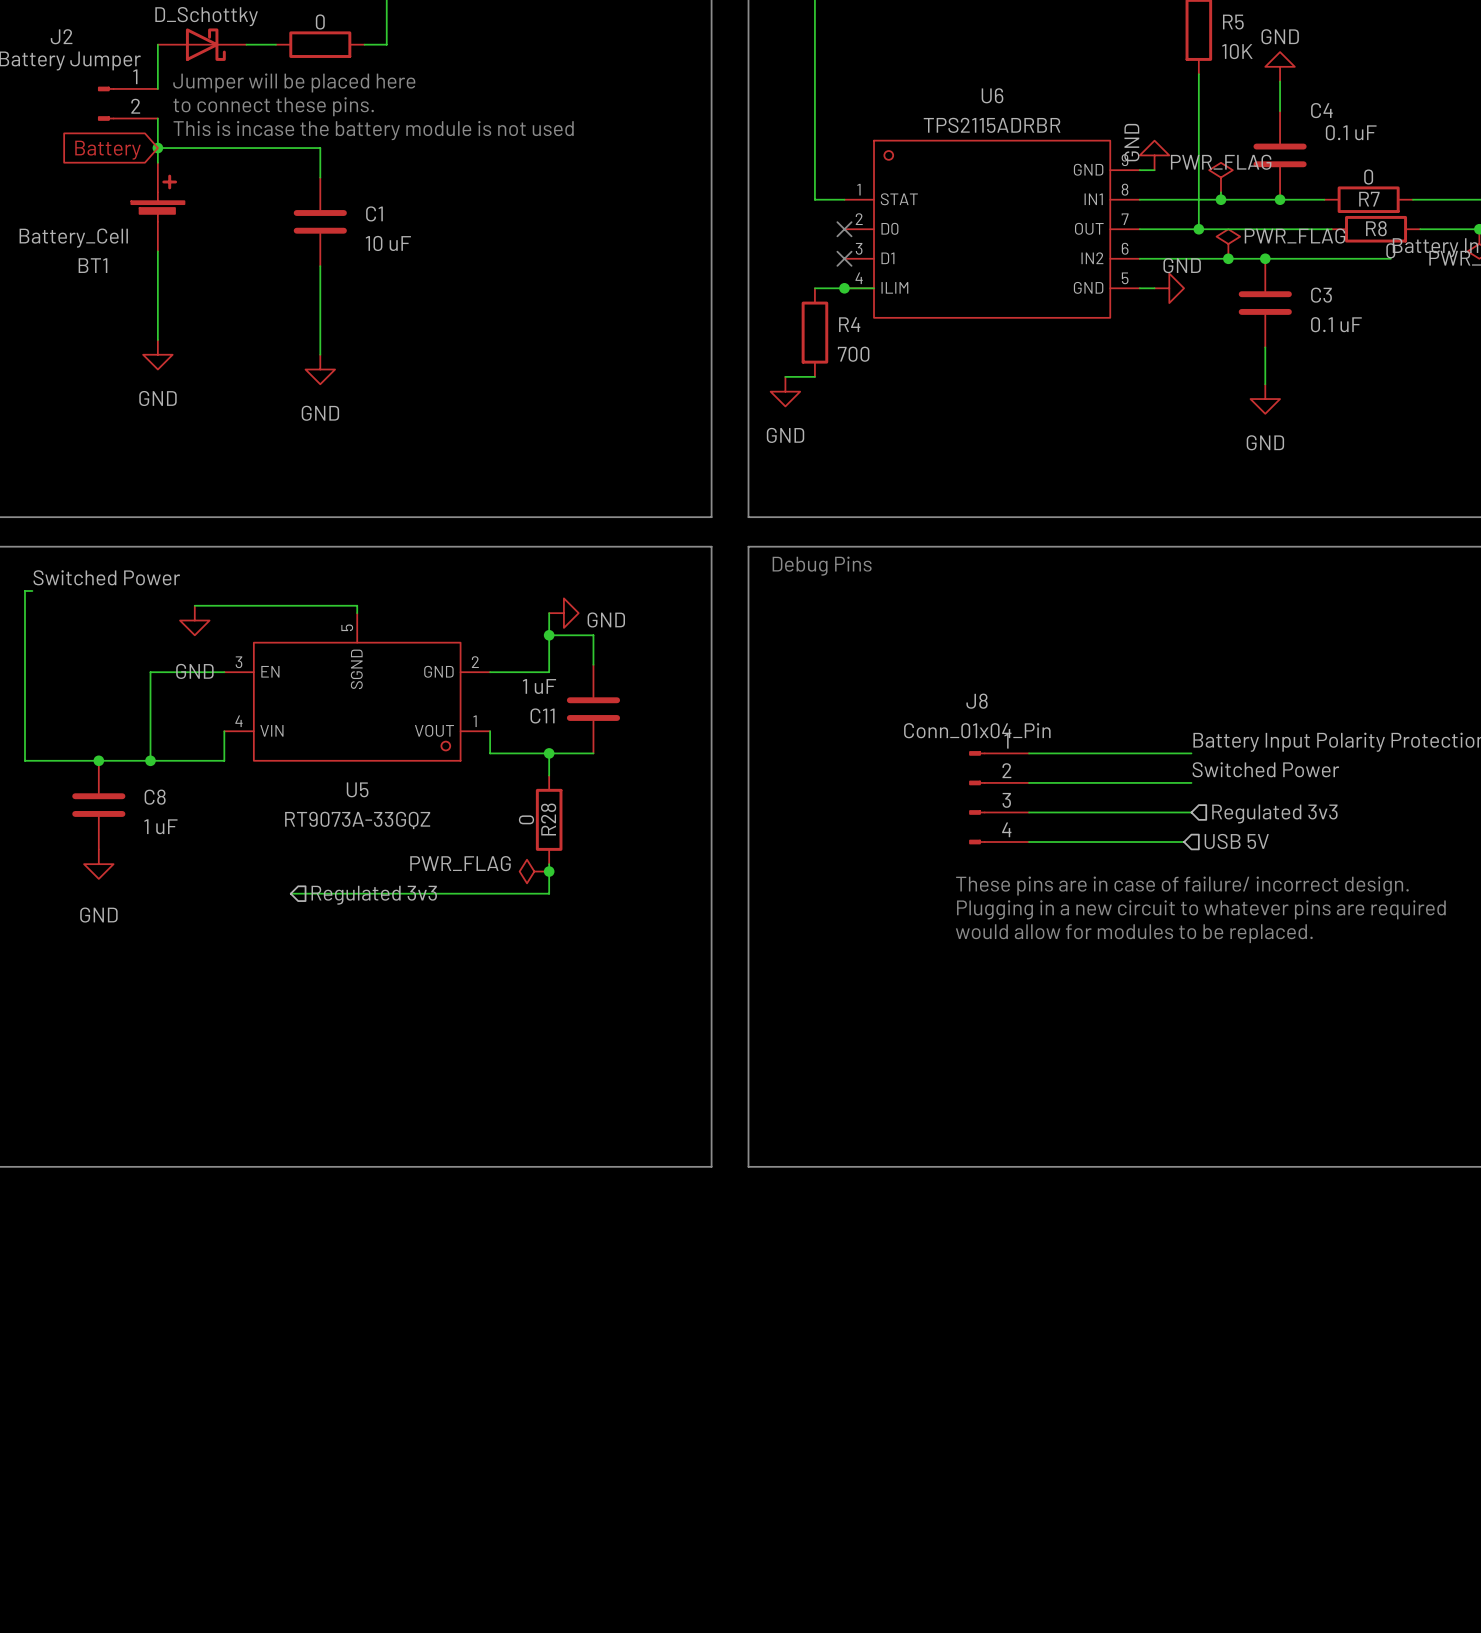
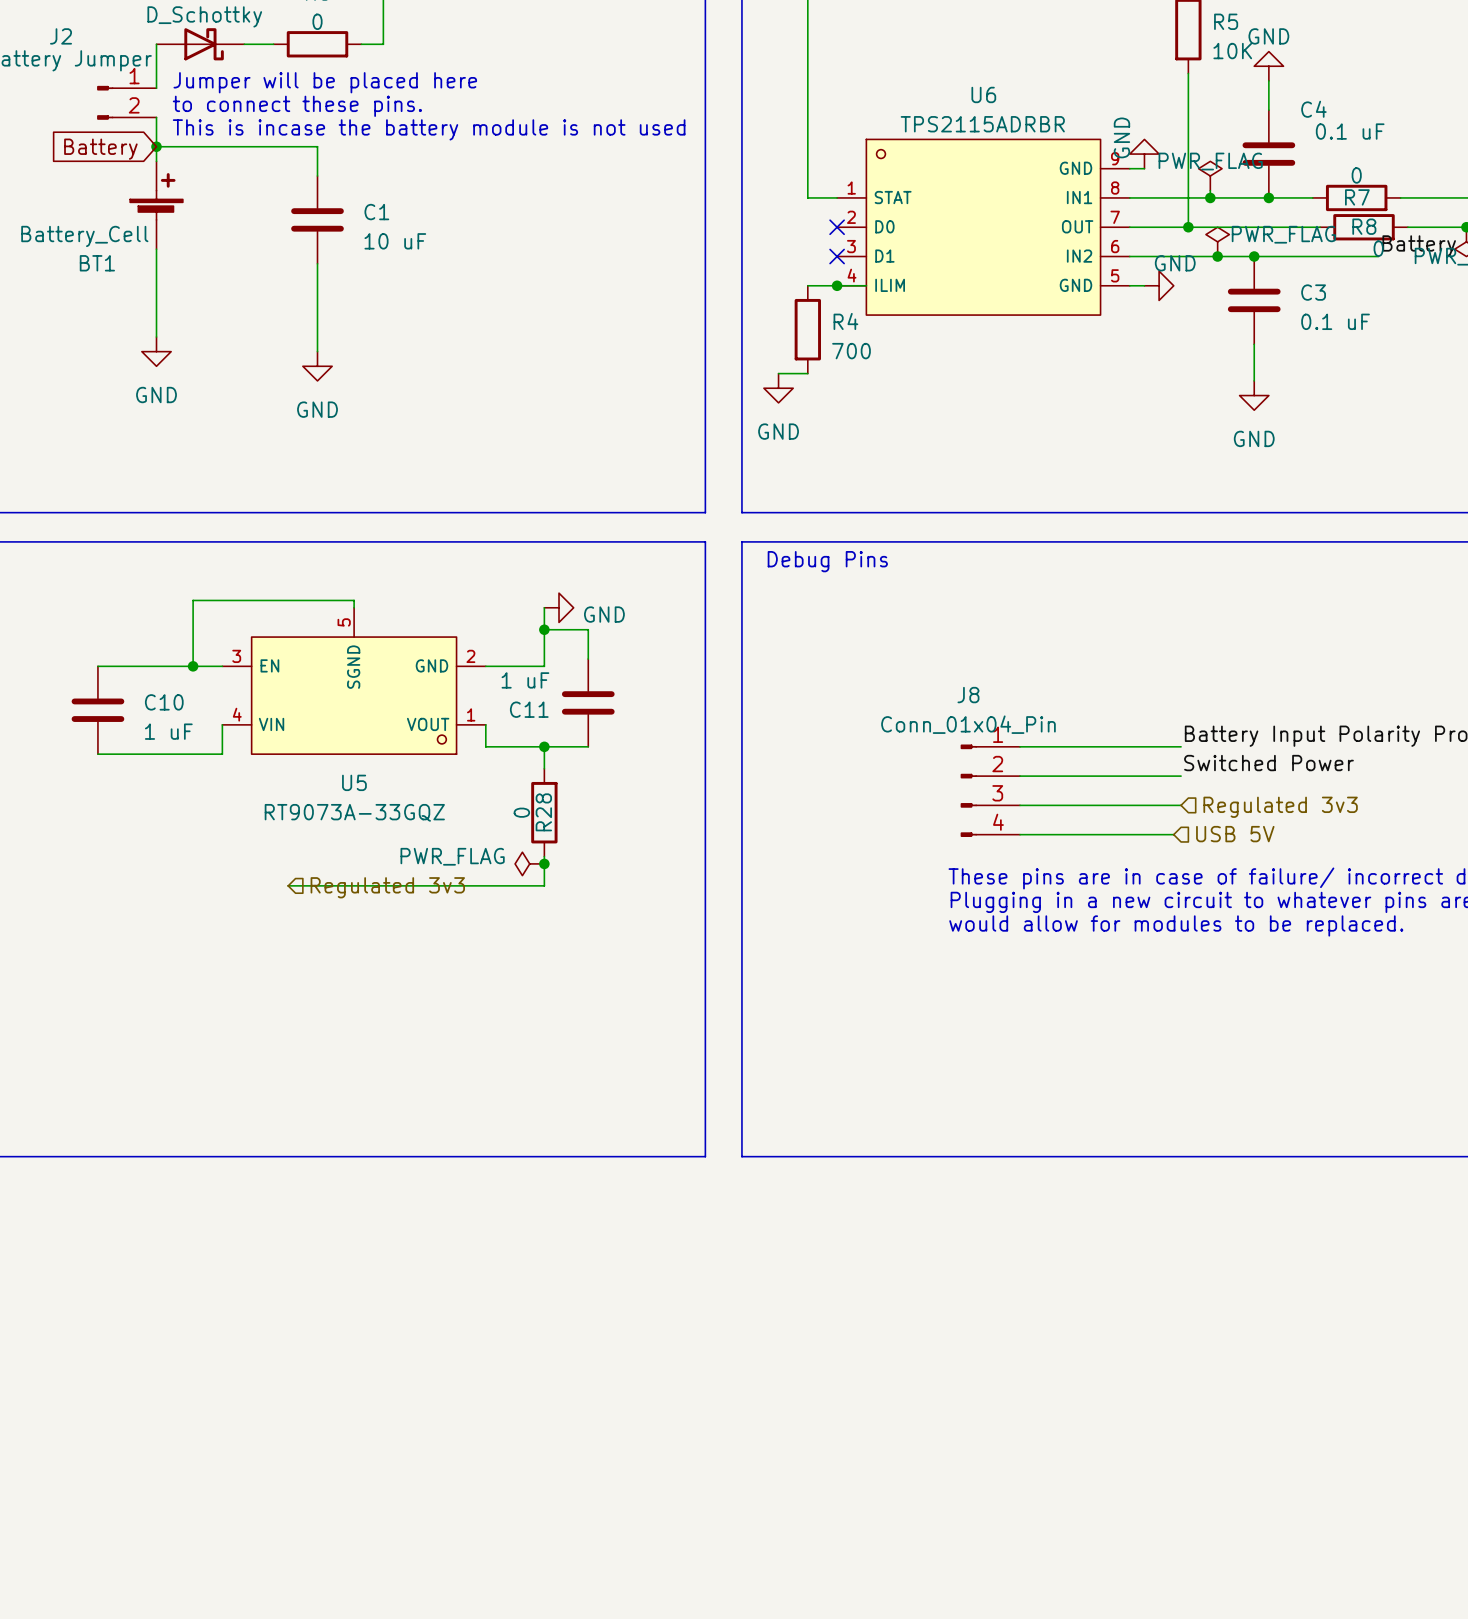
label: Switched Power (106, 577) -> none
wire: (32, 590) (24, 590) (24, 760) (98, 760) -> none
wire: none -> (193, 600) (193, 666)
power symbol: GND (194, 620) -> none
wire: (150, 672) (150, 760) -> (149, 666) (97, 666)
junction: none -> (193, 666)
C10: none -> 1 uF (97, 710)
junction: (98, 760) -> none
junction: (150, 760) -> none
C8: 1 uF (98, 805) -> none
power symbol: GND (98, 864) -> none

